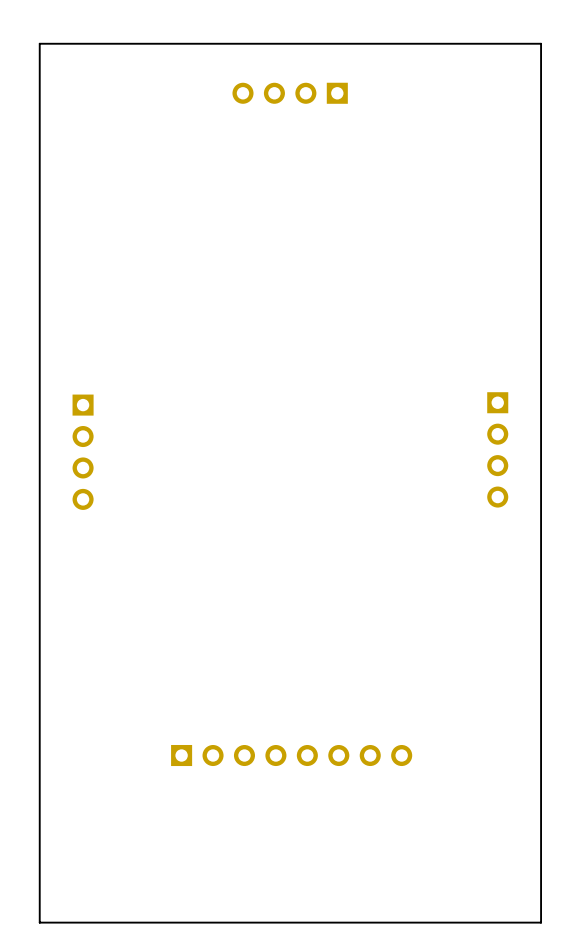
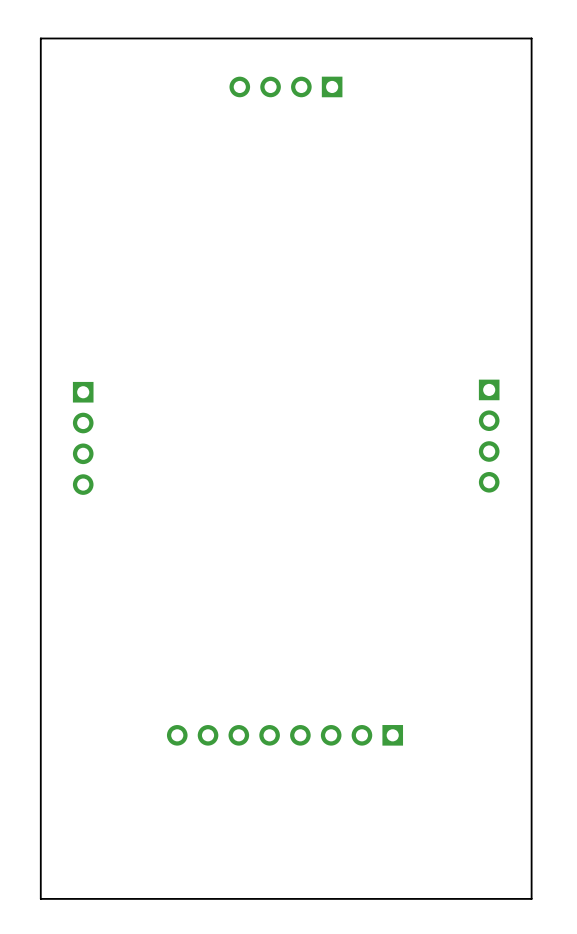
part rotation: 0° (291, 755) -> 180° (284, 735)

